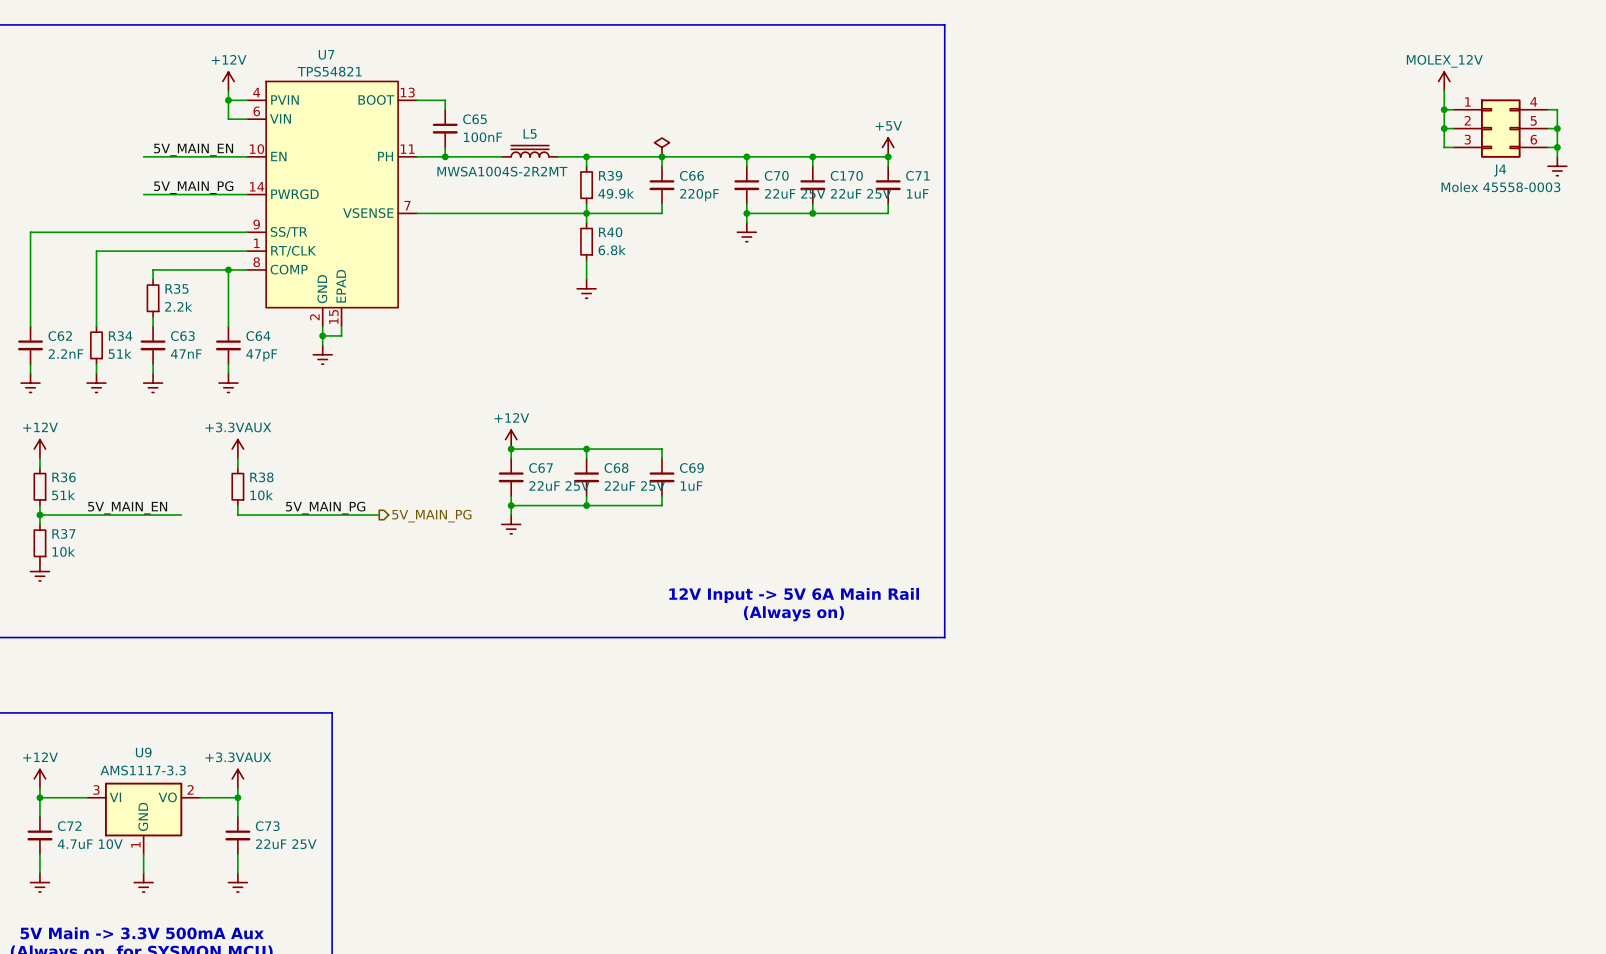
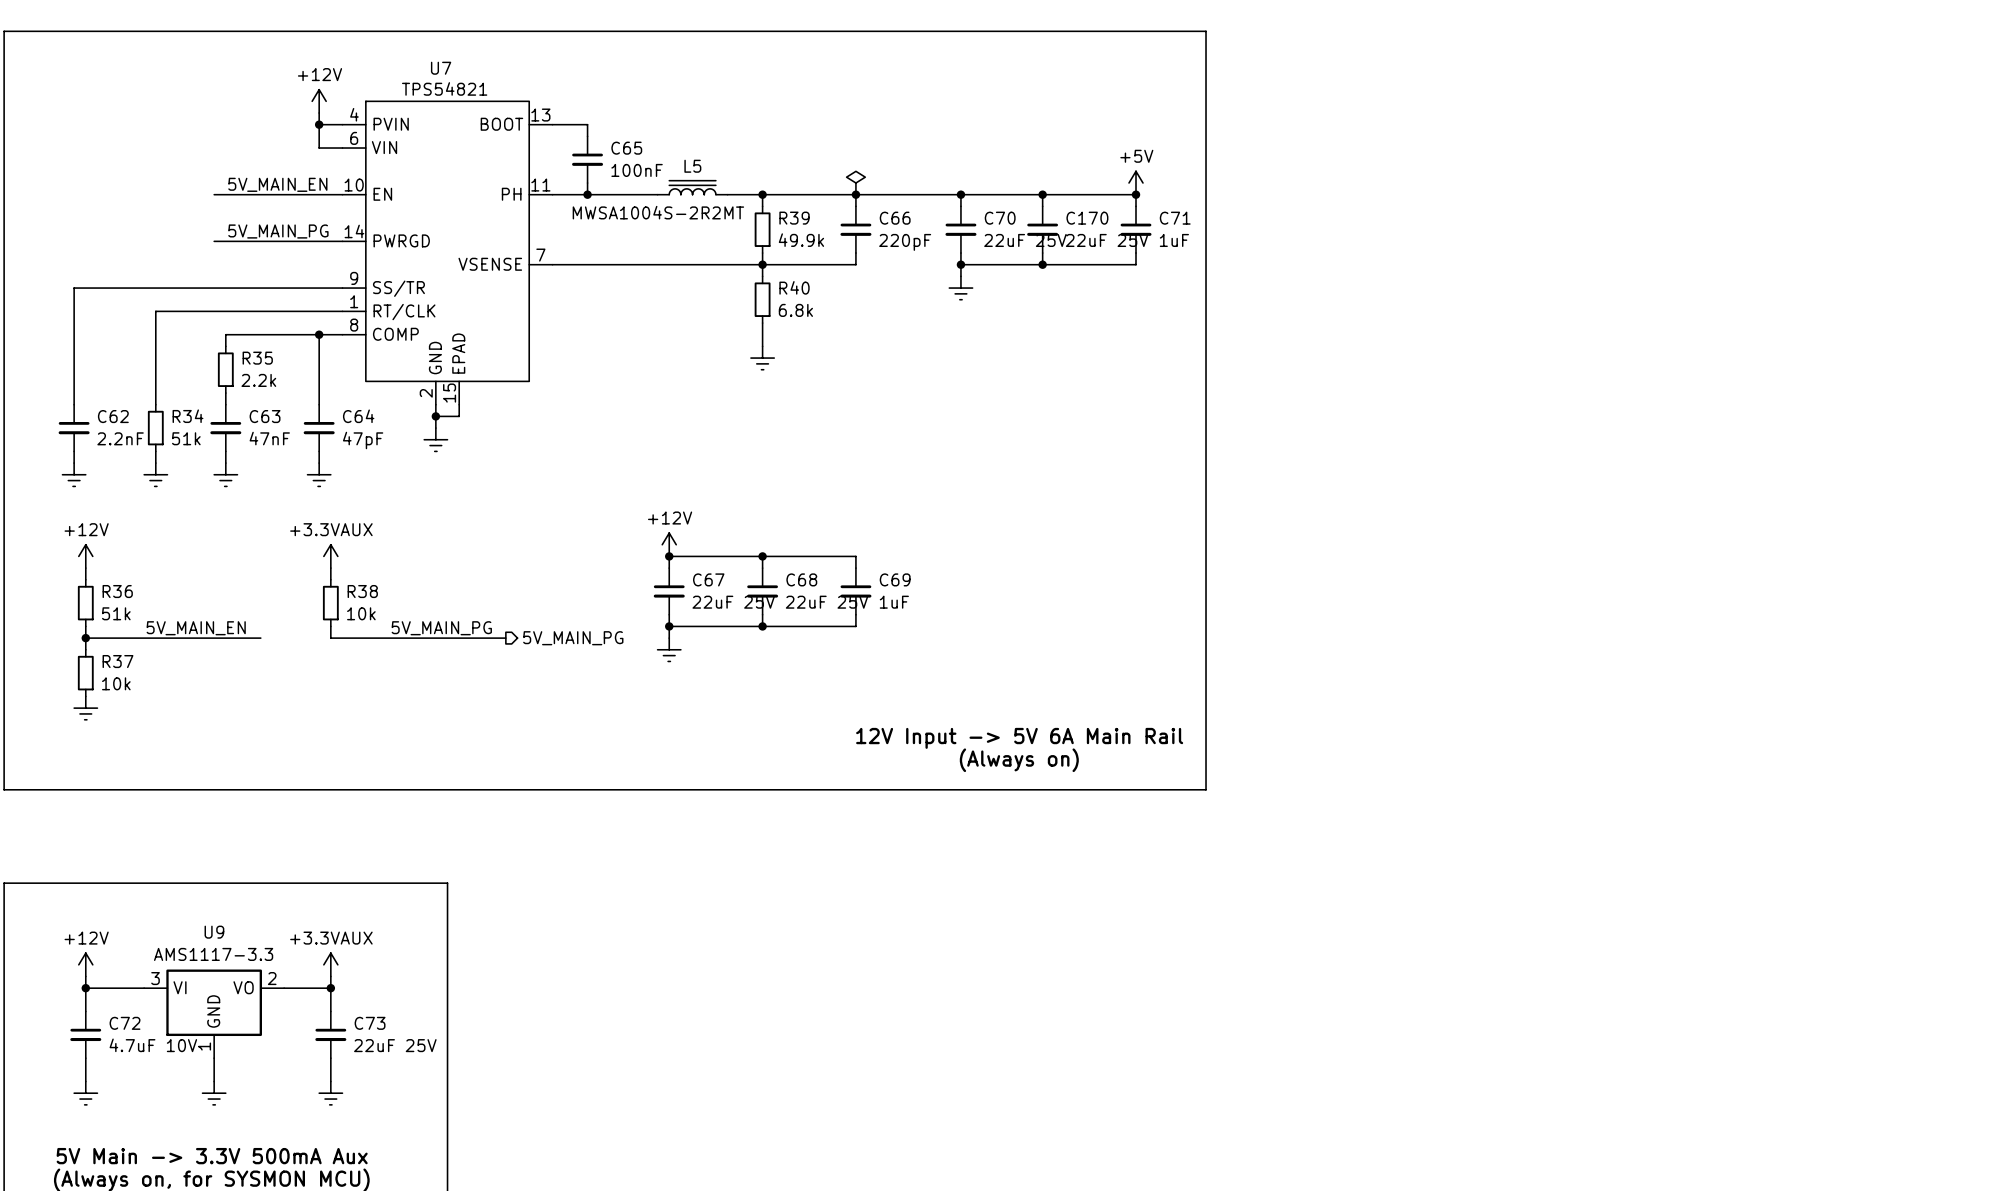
power symbol: MOLEX_12V (1444, 81) -> none
wire: (1444, 90) (1444, 147) (1453, 147) -> none
wire: (1444, 109) (1453, 109) -> none
junction: (1444, 109) -> none
wire: (1547, 109) (1557, 109) (1557, 156) -> none
wire: (1444, 128) (1453, 128) -> none
junction: (1444, 128) -> none
J4: Molex 45558-0003 (1500, 128) -> none
wire: (1547, 128) (1557, 128) -> none
junction: (1557, 128) -> none
wire: (1547, 147) (1557, 147) -> none
junction: (1557, 147) -> none
power symbol: (1557, 166) -> none

